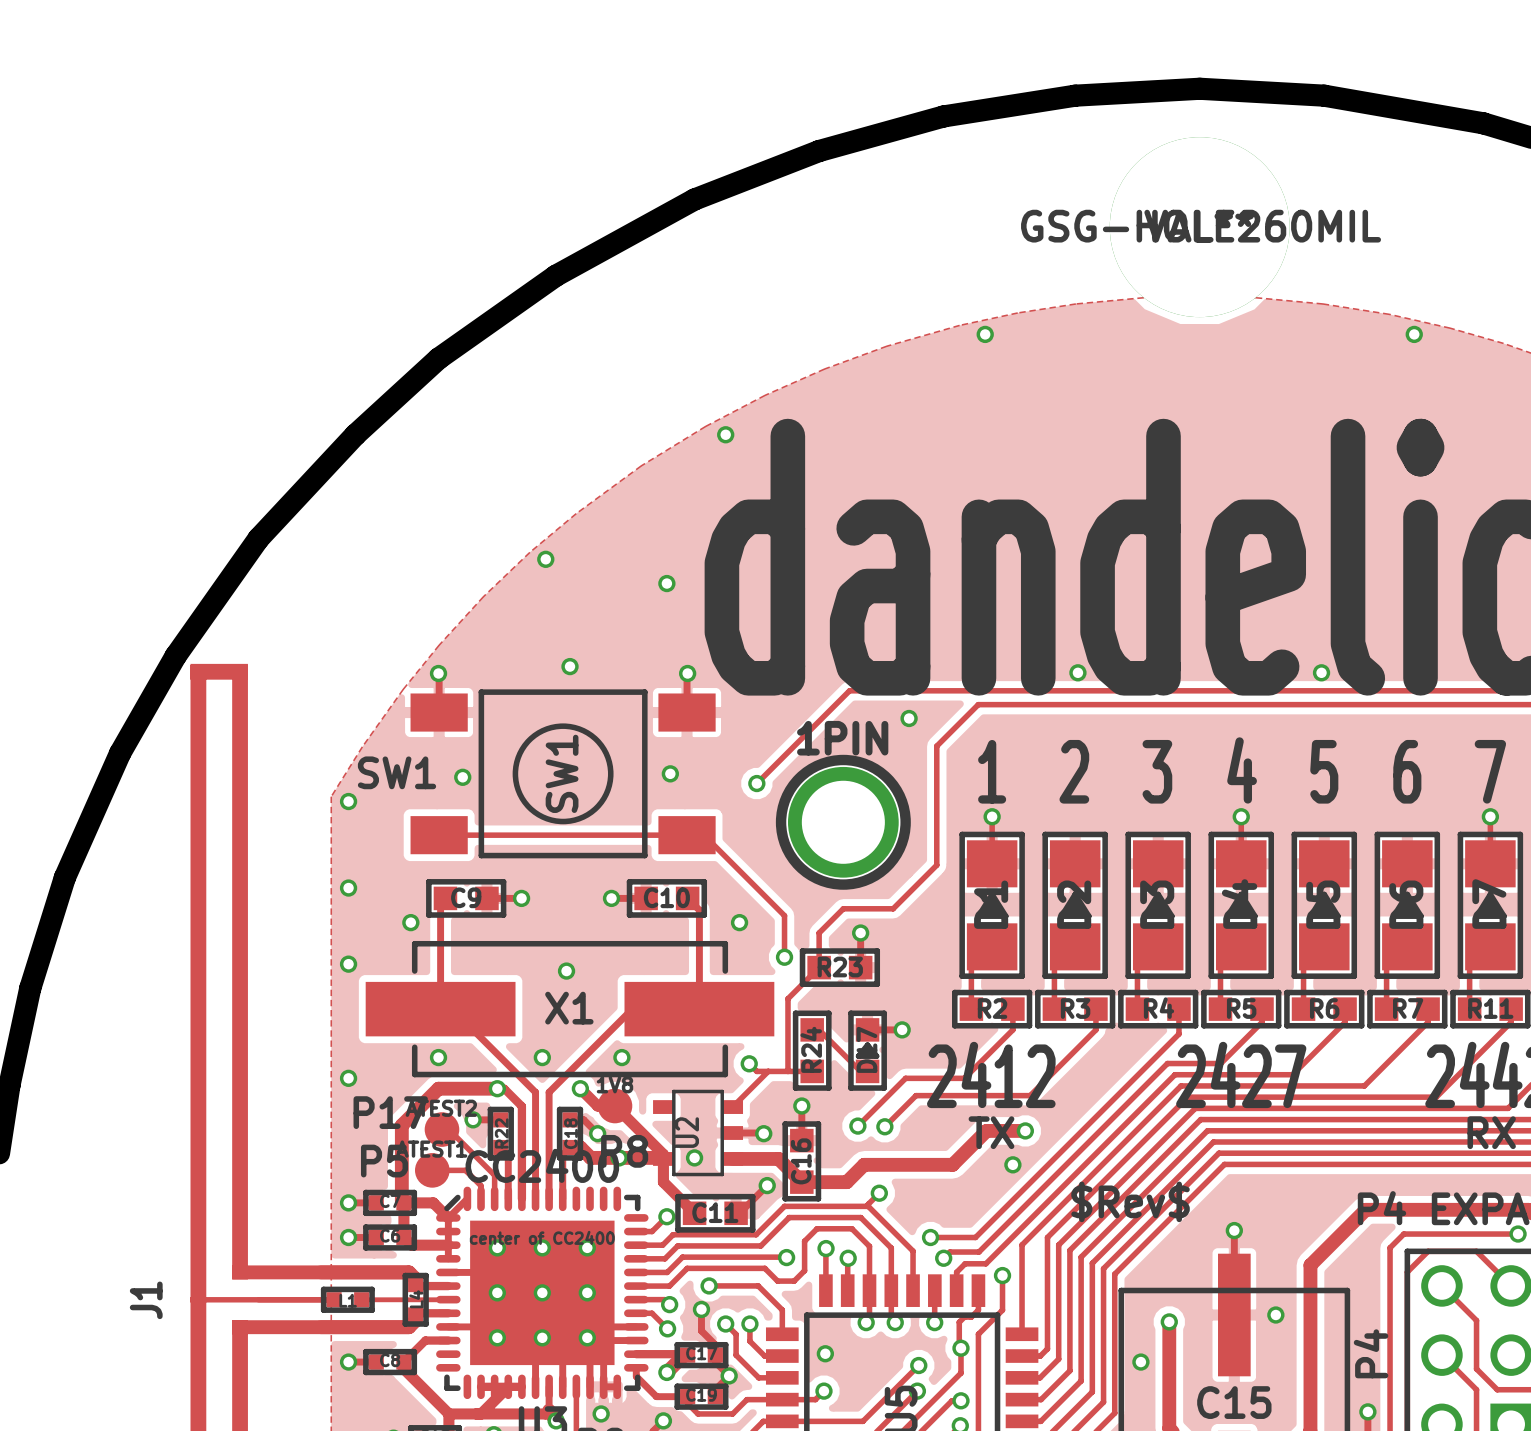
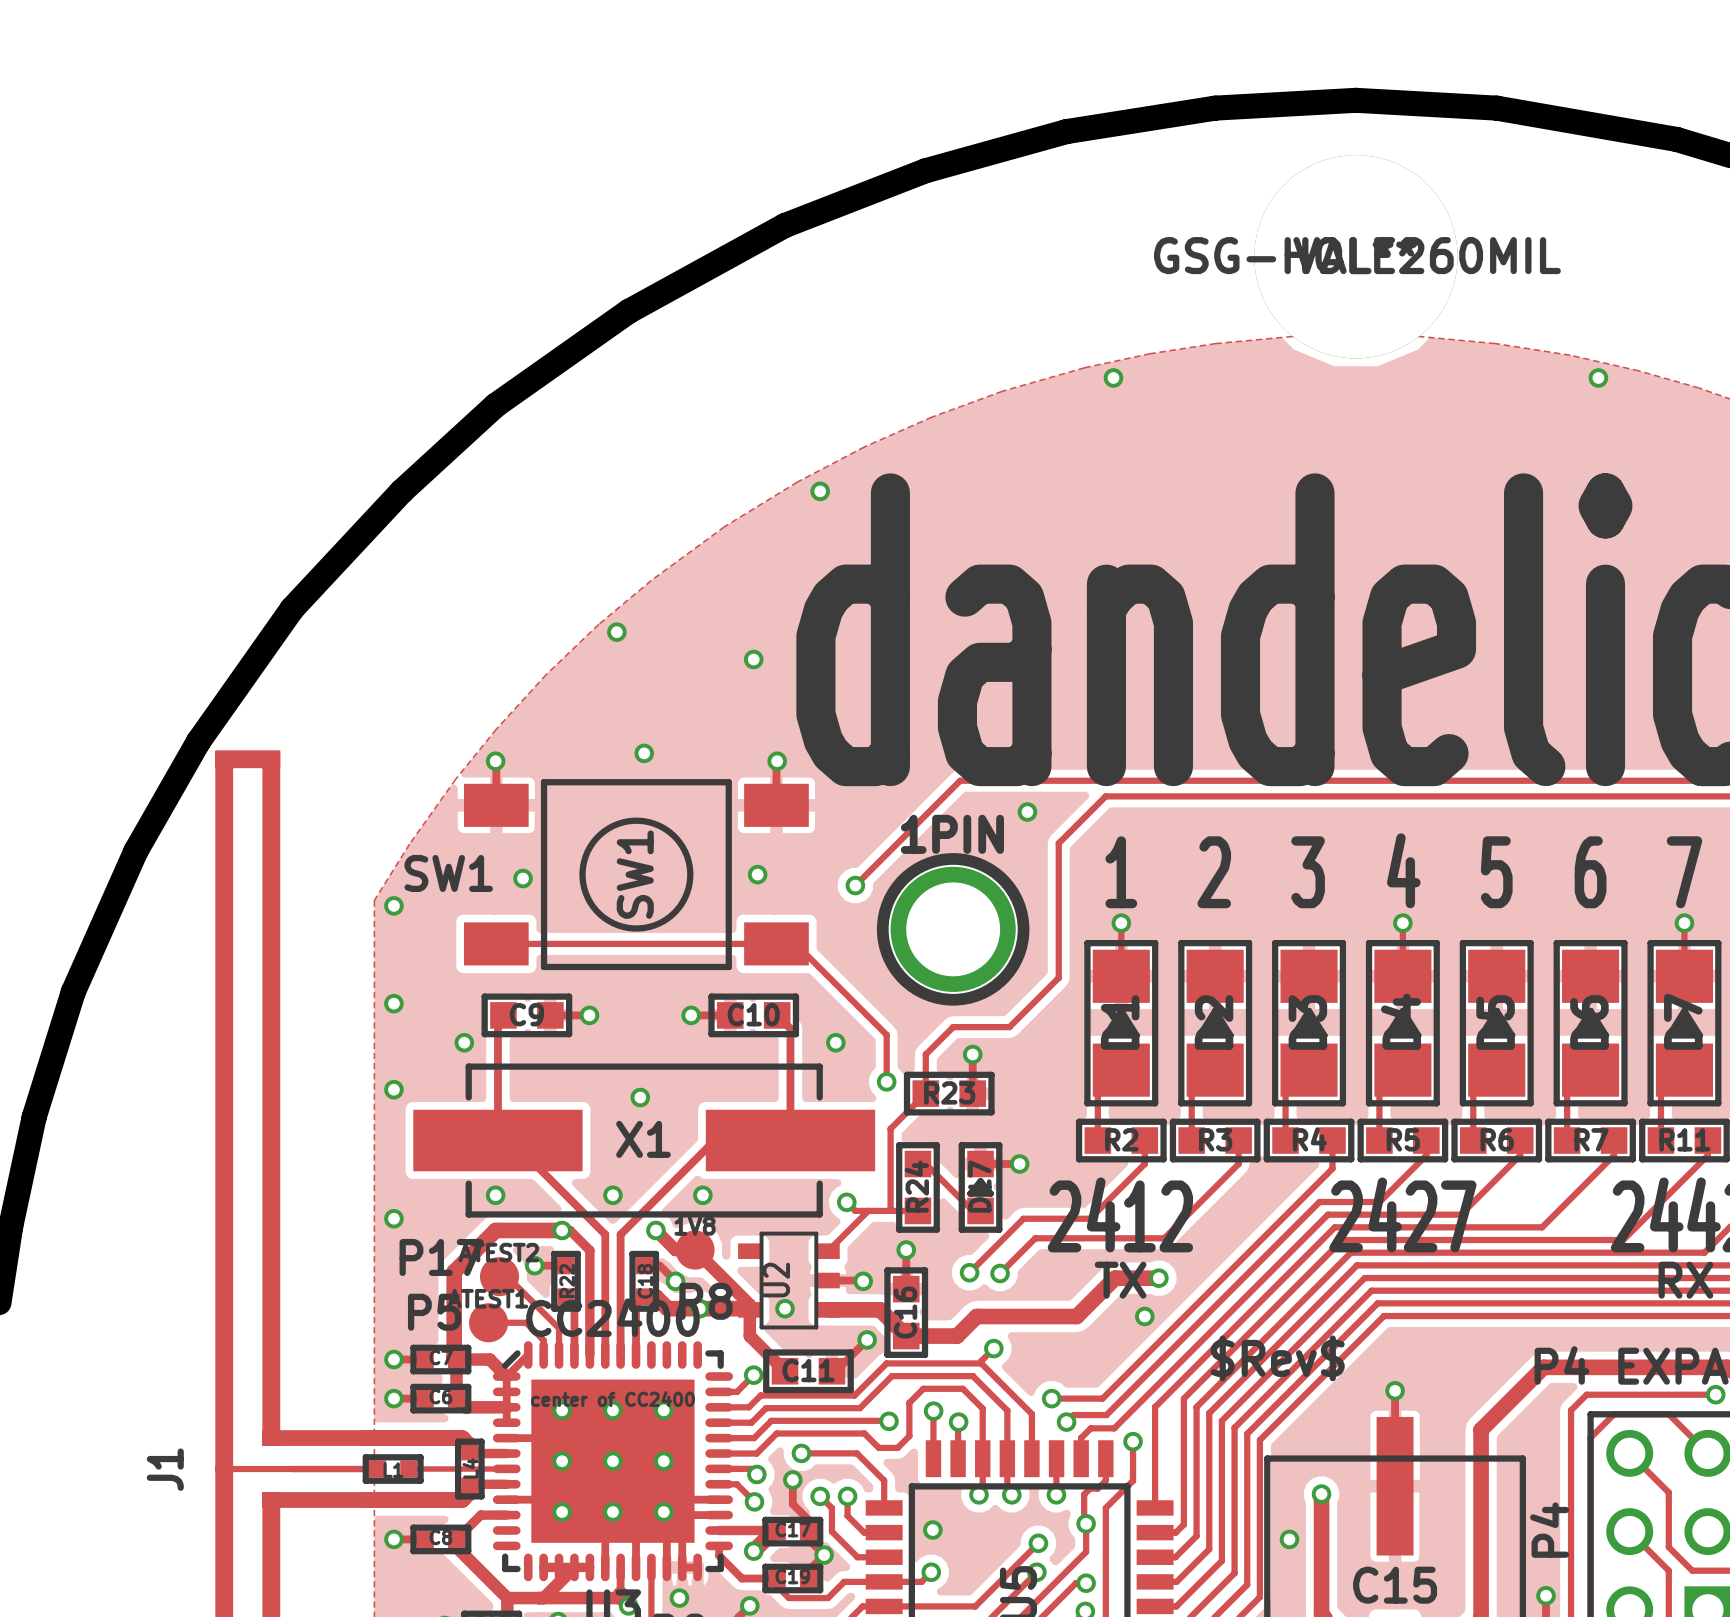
via: (1077, 672) -> none
via: (1321, 672) -> none
via: (1275, 1315) -> none

